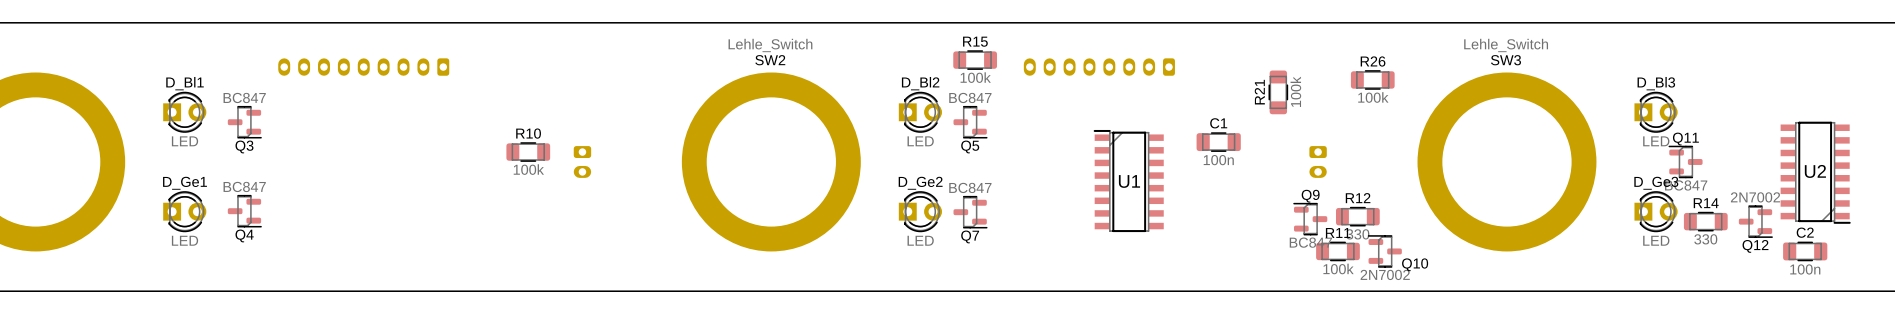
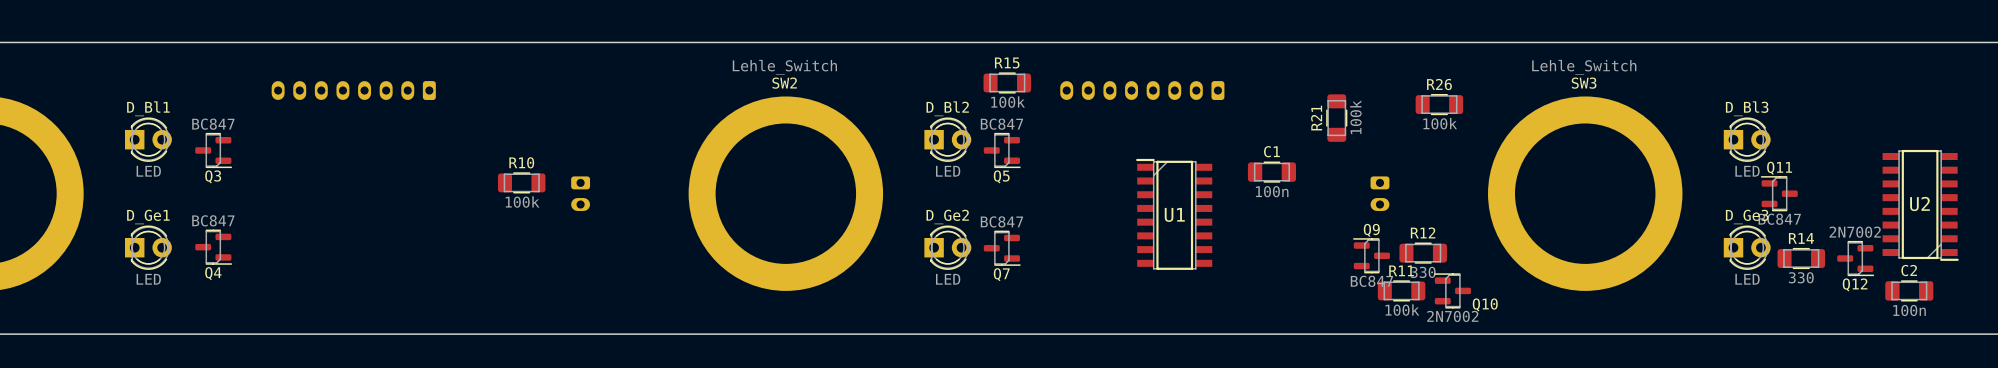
part footprint: [278, 58, 450, 76] -> [271, 81, 436, 100]

